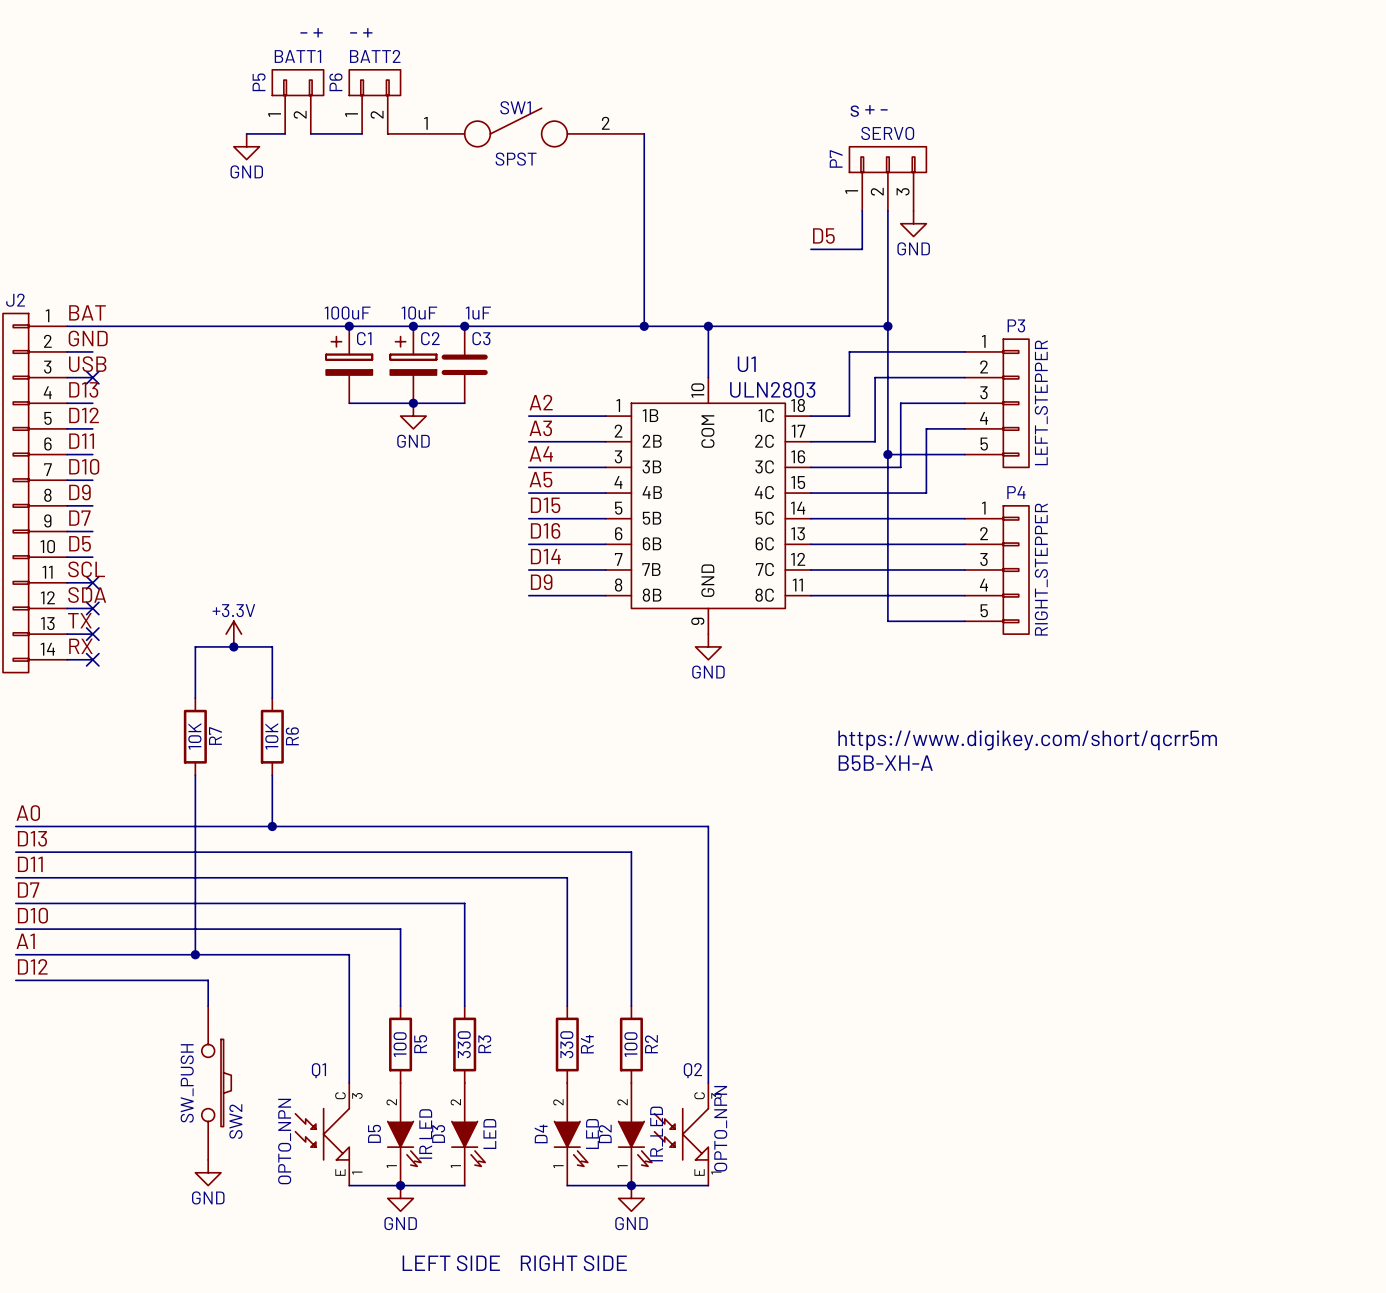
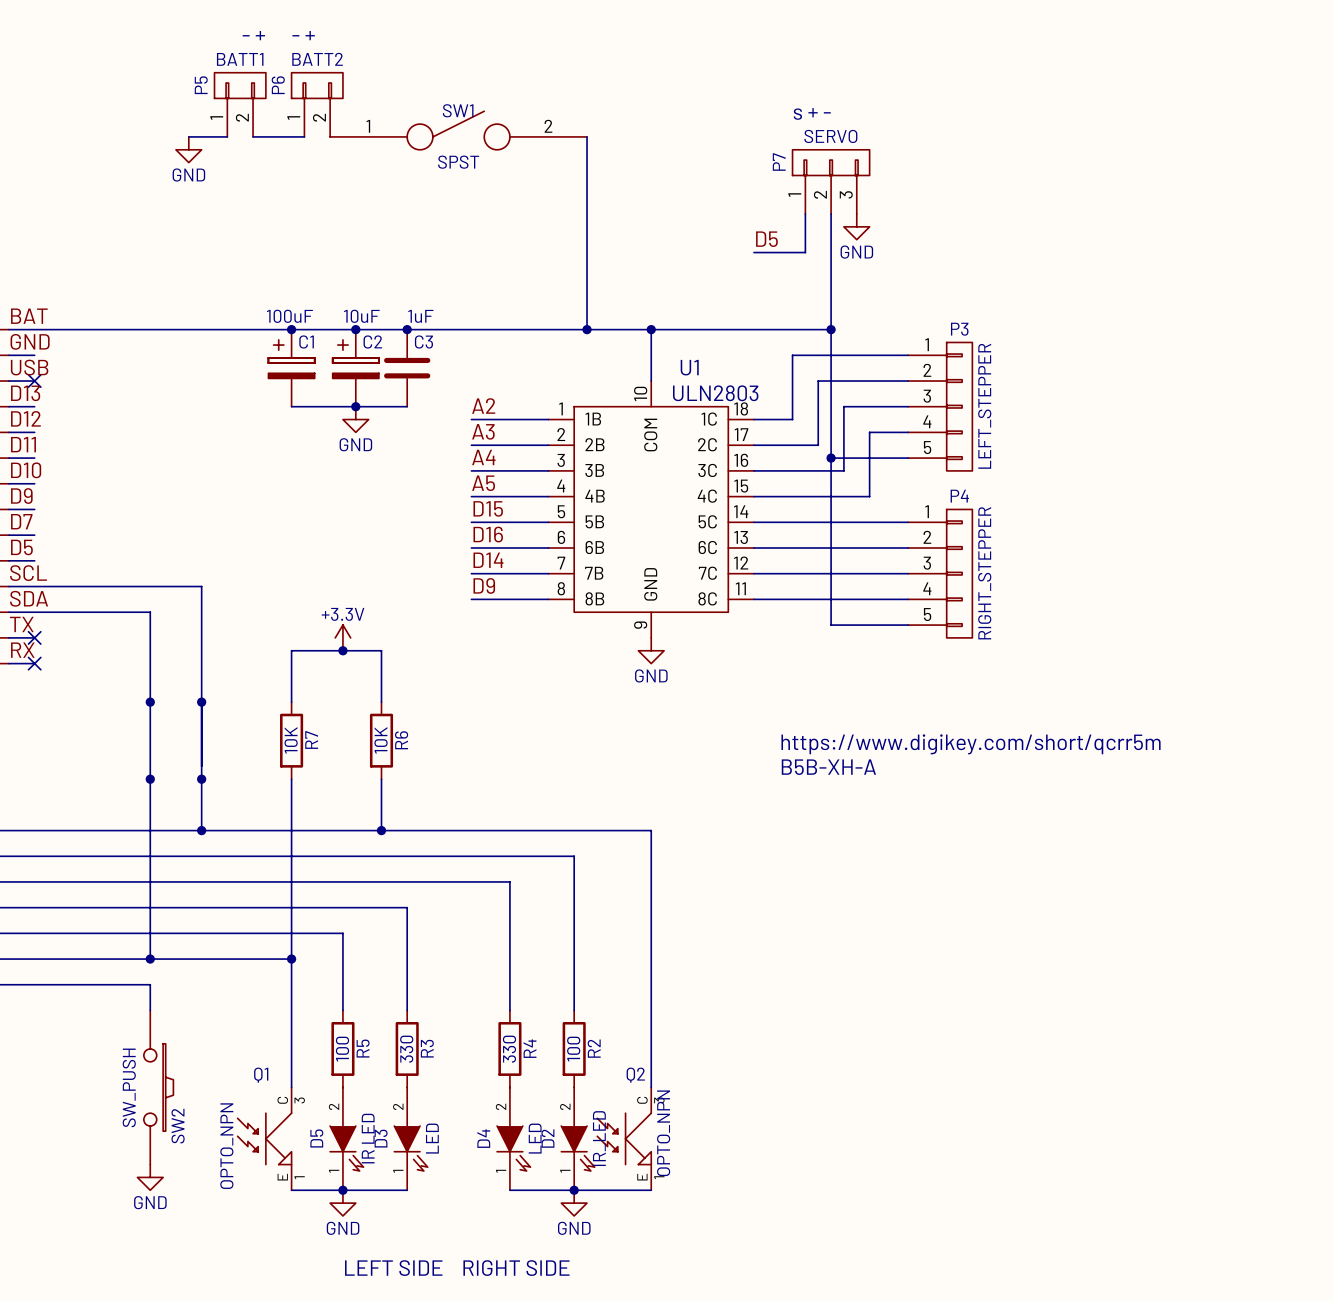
wire: none -> (34, 586) (201, 586) (201, 830)
no-connect mark: (92, 582) -> none
wire: none -> (34, 612) (150, 612) (150, 959)
no-connect mark: (92, 608) -> none
power symbol position: +3.3V (233, 634) -> +3.3V (342, 637)
junction: (233, 646) -> none
junction: none -> (342, 650)
wire: (195, 698) (195, 646) (272, 646) (272, 698) -> none
junction: none -> (150, 702)
junction: none -> (201, 702)
wire: none -> (291, 702) (291, 650) (381, 650) (381, 702)
R7 position: (195, 736) -> (291, 740)
R6 position: (272, 736) -> (381, 740)
wire: (195, 775) (195, 954) -> (291, 779) (291, 959)
junction: none -> (150, 779)
junction: none -> (201, 779)
wire: (272, 775) (272, 826) -> (381, 779) (381, 830)
junction position: (272, 826) -> (201, 830)
junction: none -> (381, 830)
junction position: (195, 954) -> (150, 959)
junction: none -> (291, 959)

